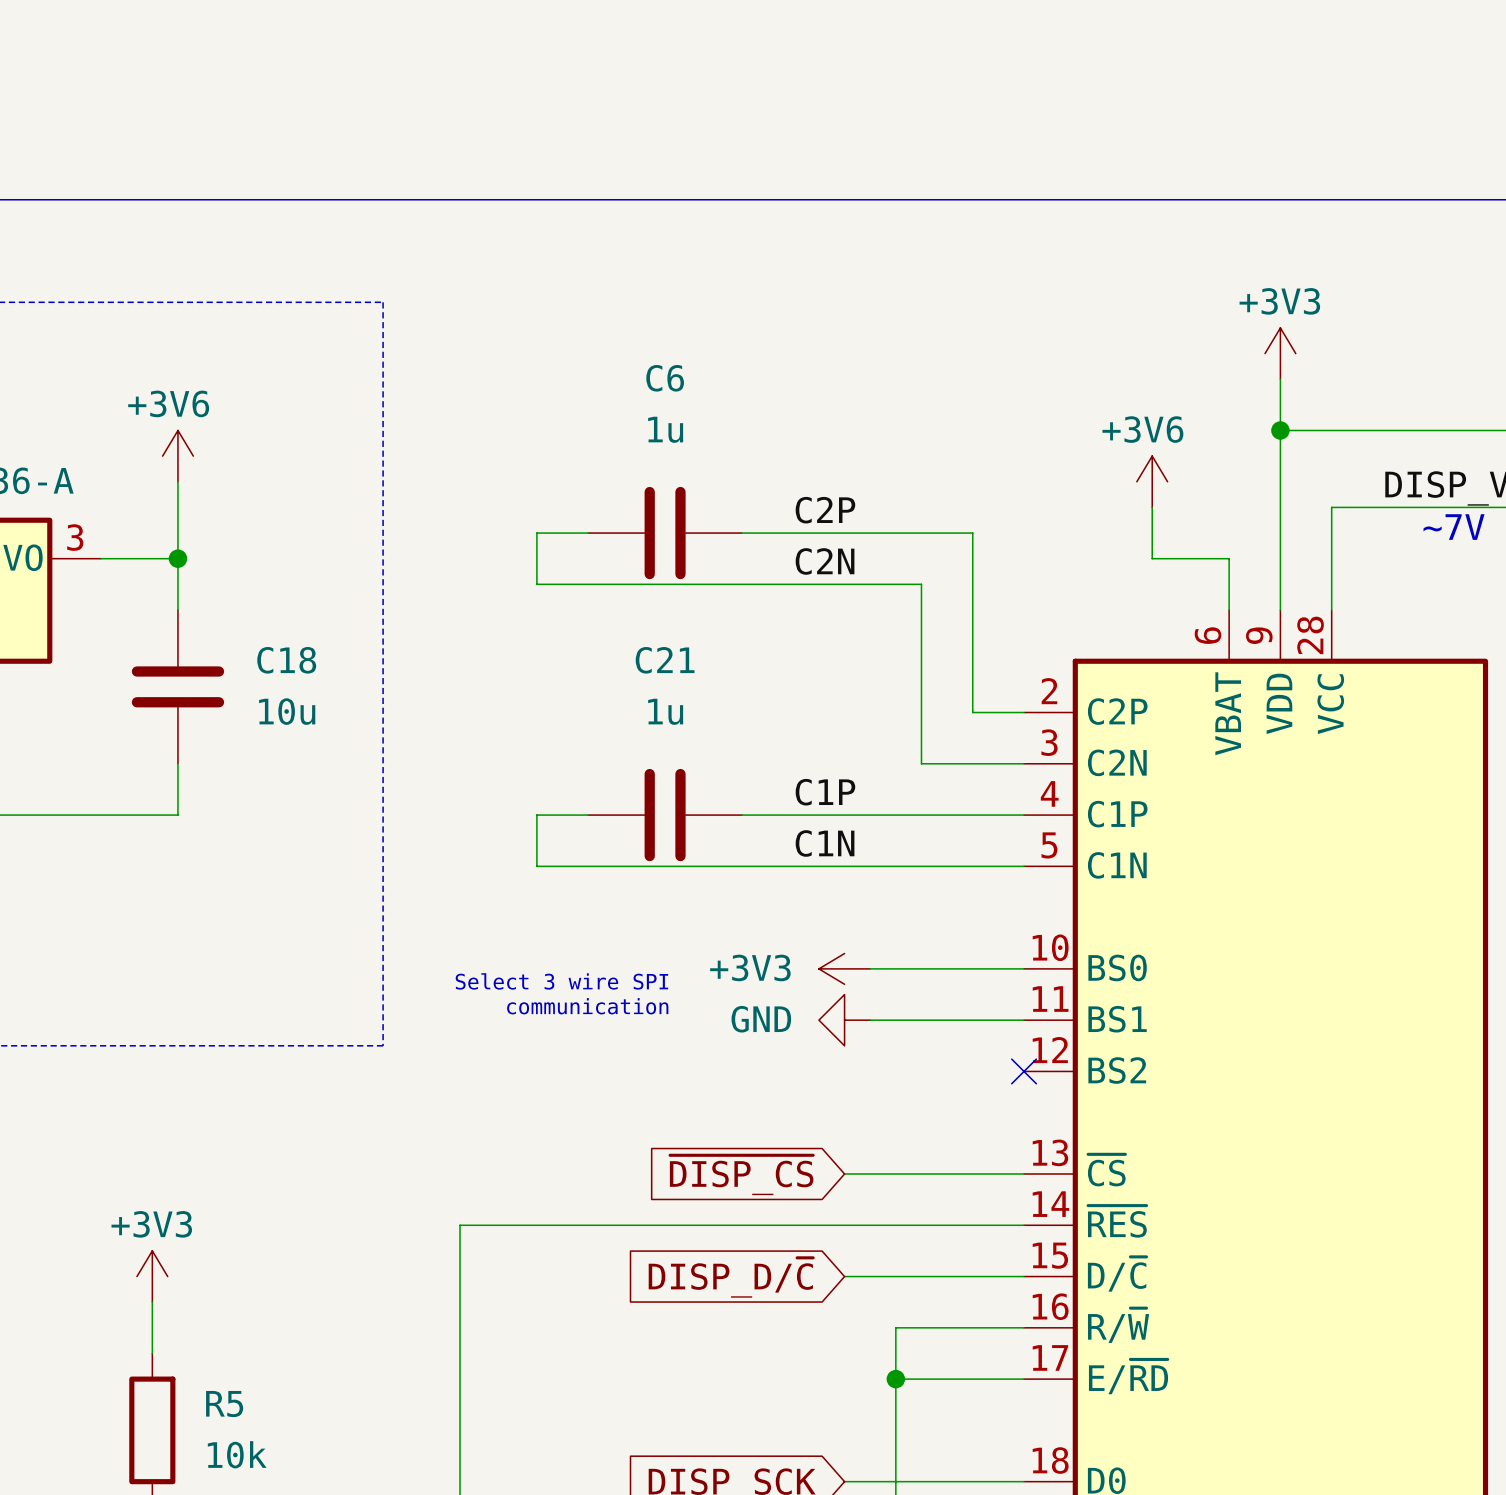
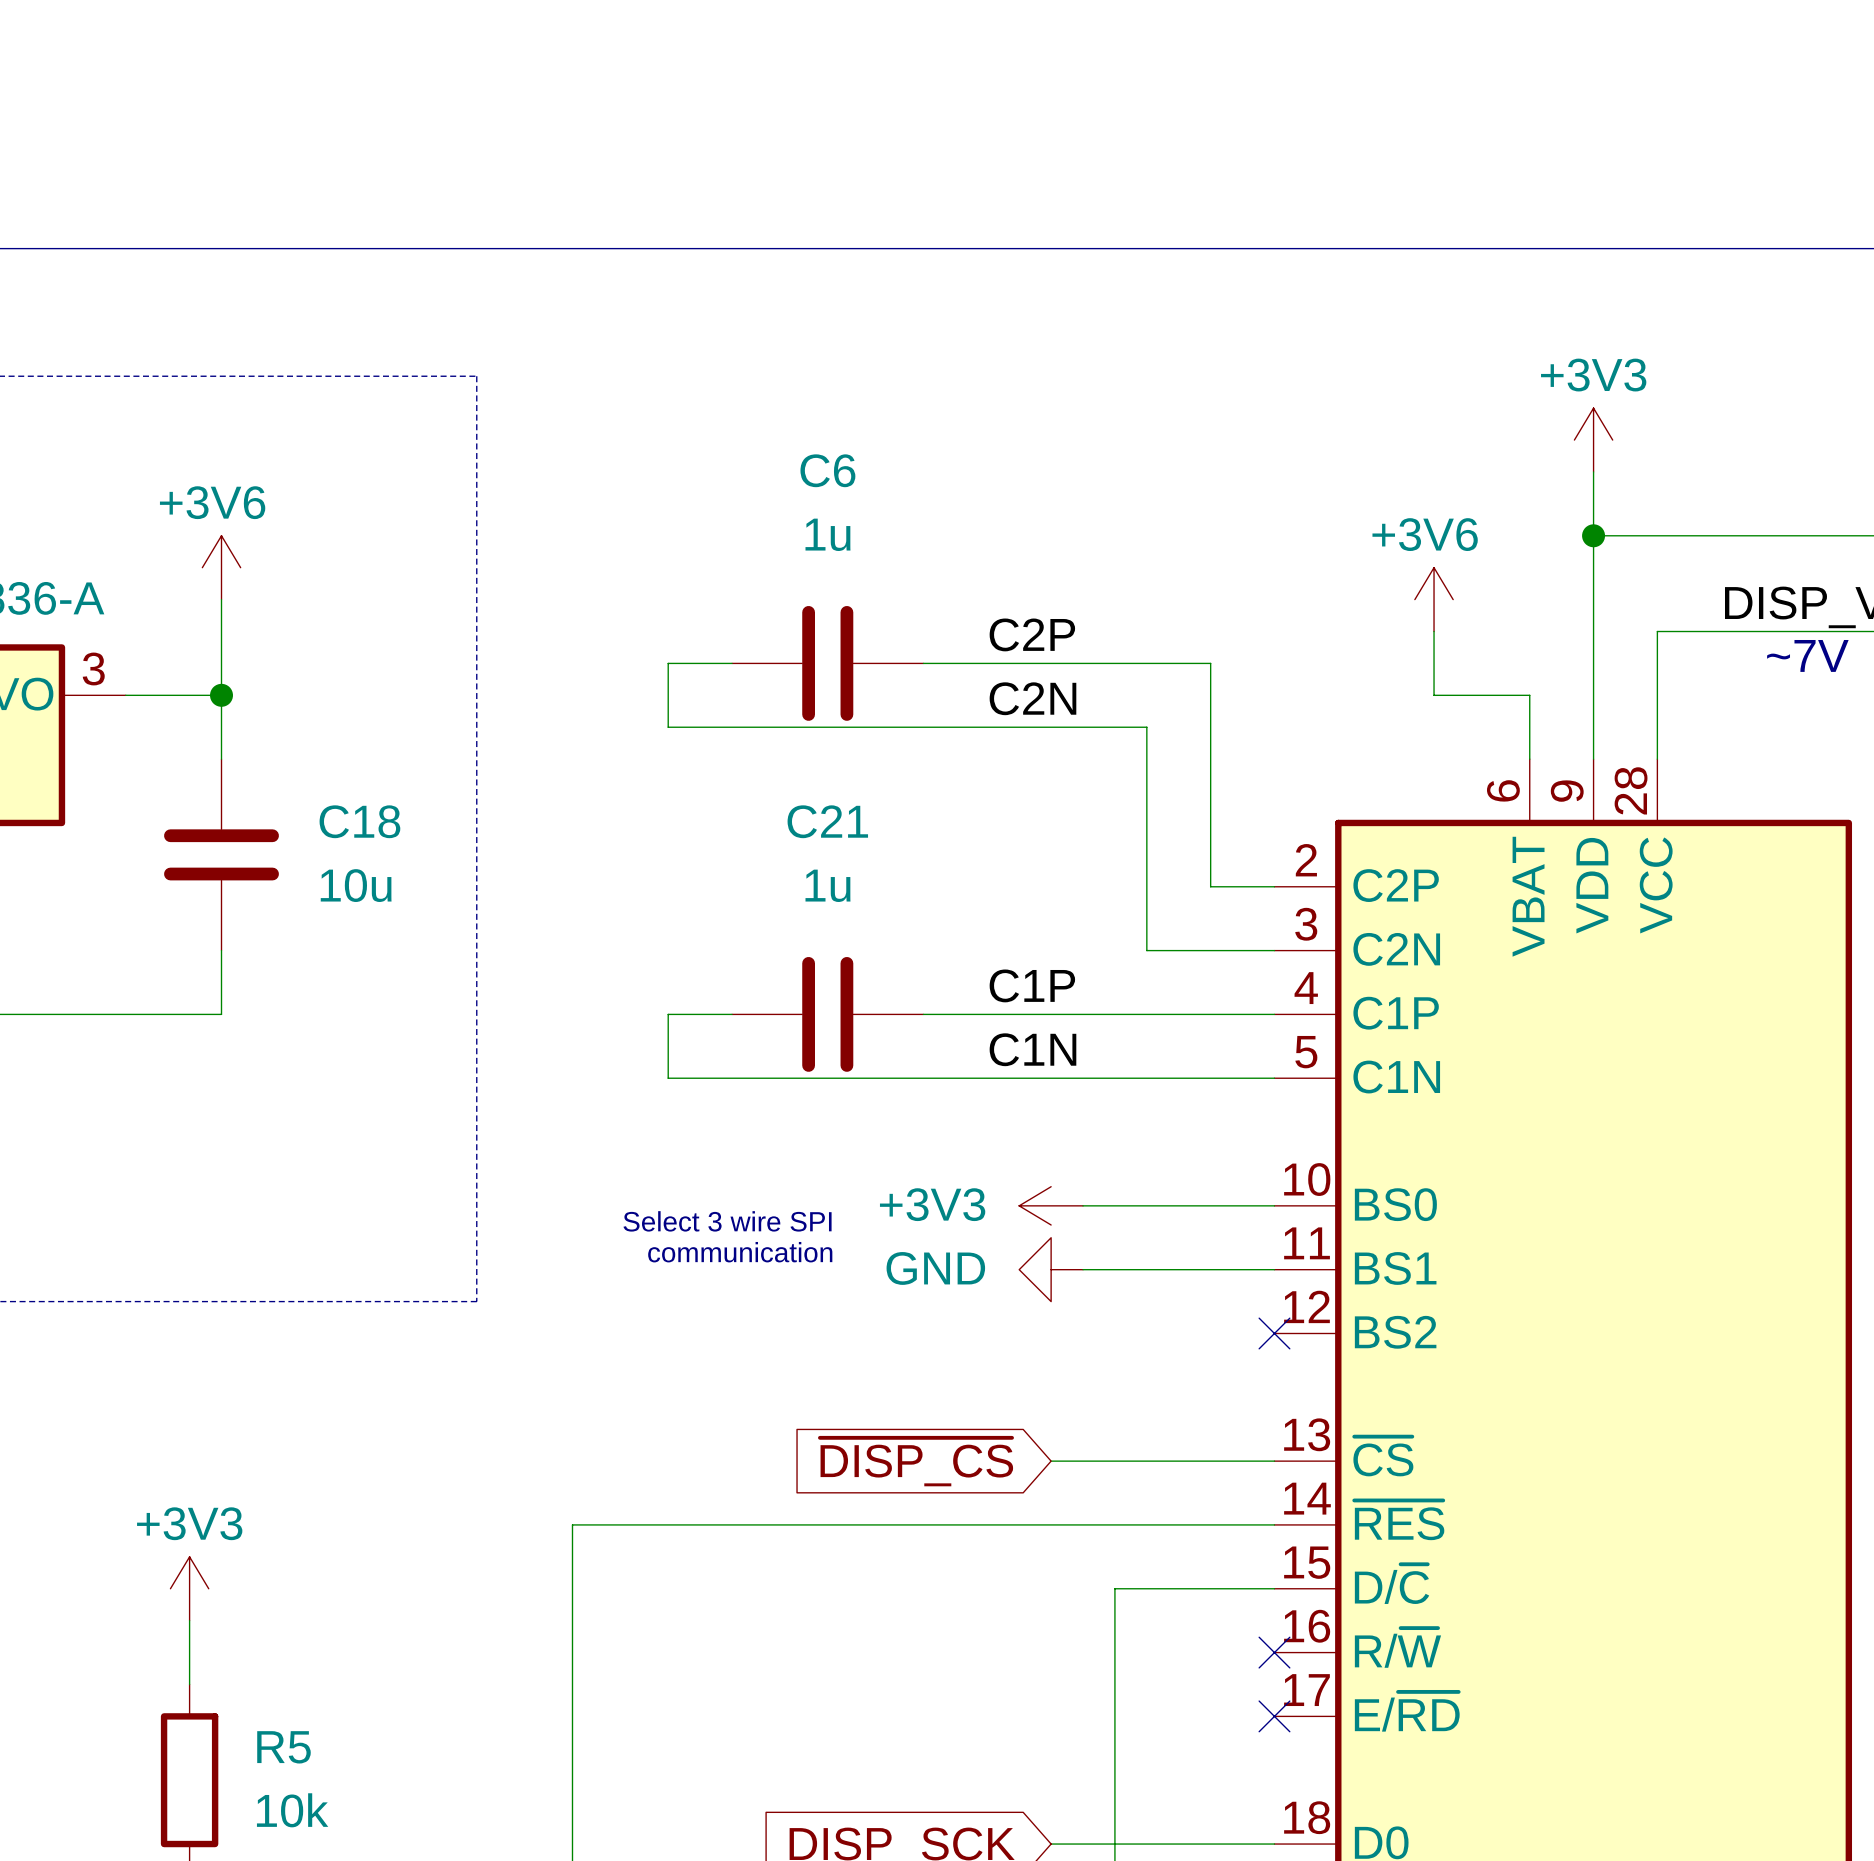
wire: (844, 1276) (895, 1276) -> (1114, 1652) (1114, 1588)
global label: DISP_D/~{C} (730, 1277) -> none
wire: (895, 1327) (1024, 1327) -> none
no-connect mark: none -> (1274, 1652)
wire: (895, 1379) (1024, 1379) -> none
junction: (895, 1379) -> none
no-connect mark: none -> (1274, 1716)

